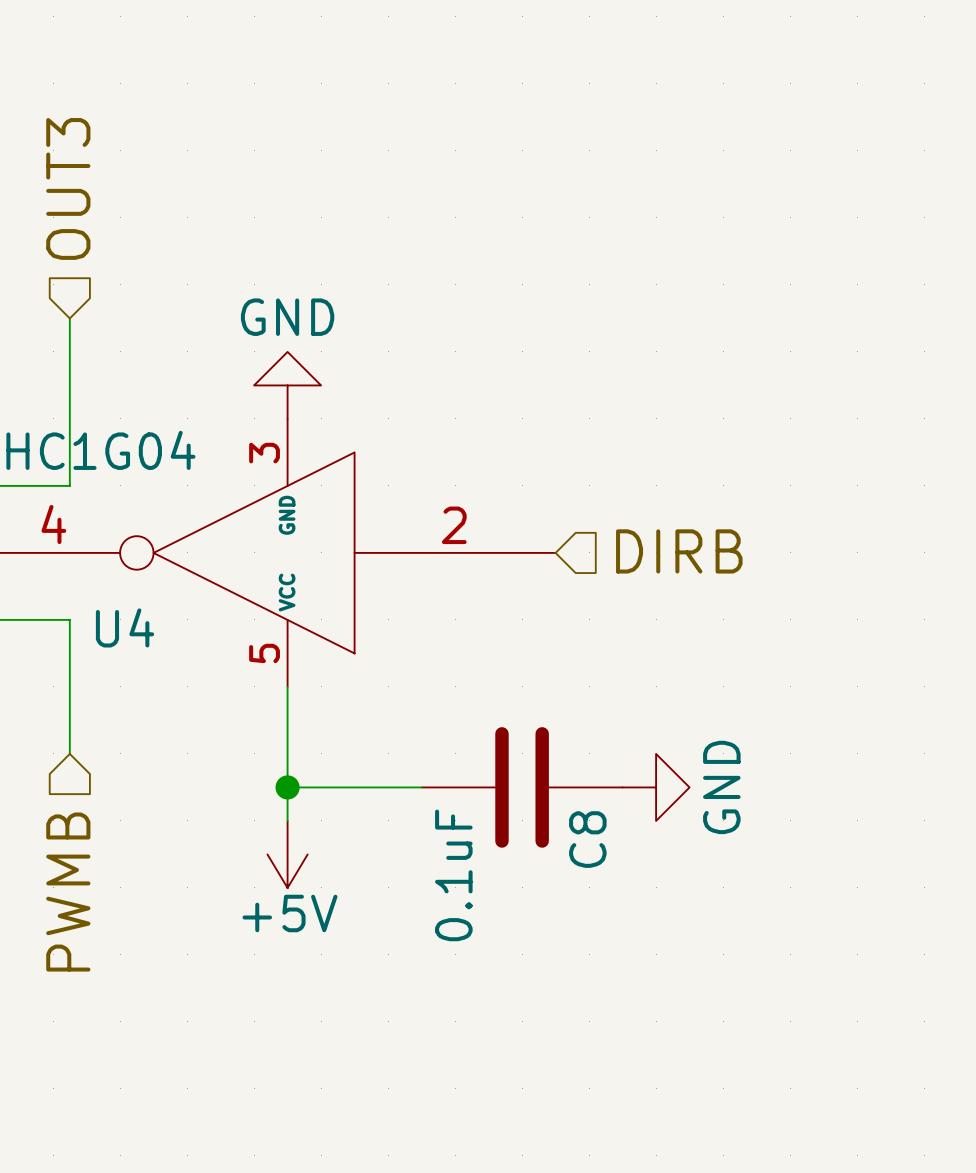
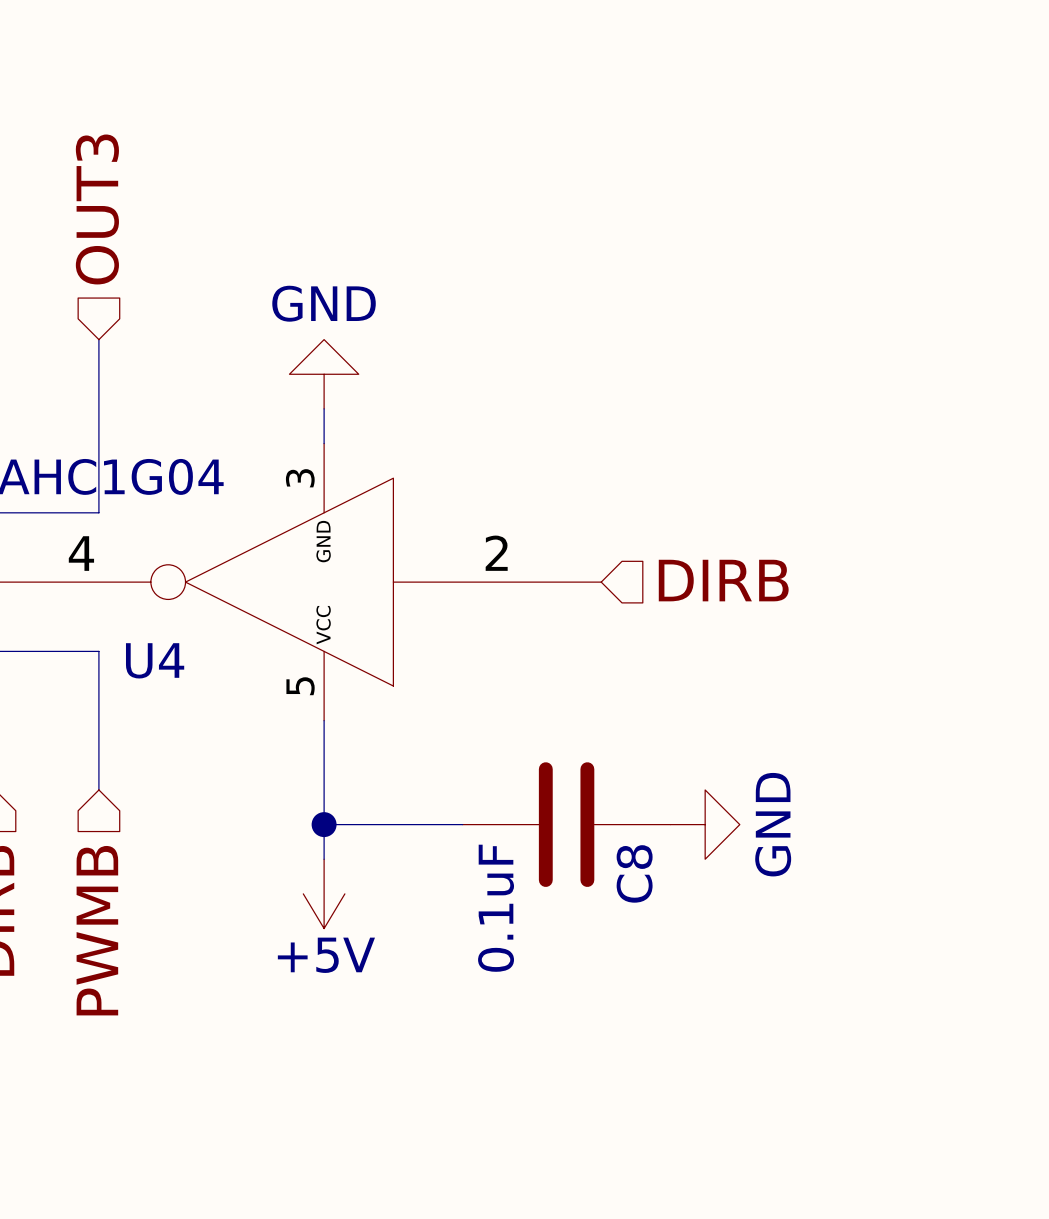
power symbol position: GND (287, 385) -> GND (324, 374)

